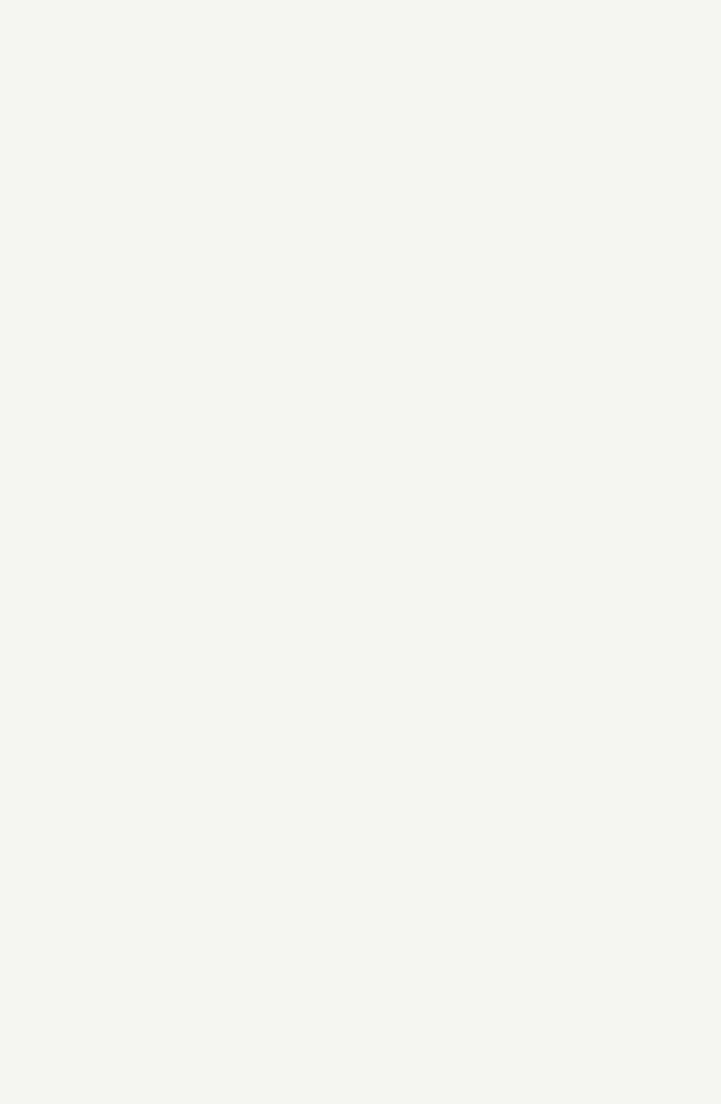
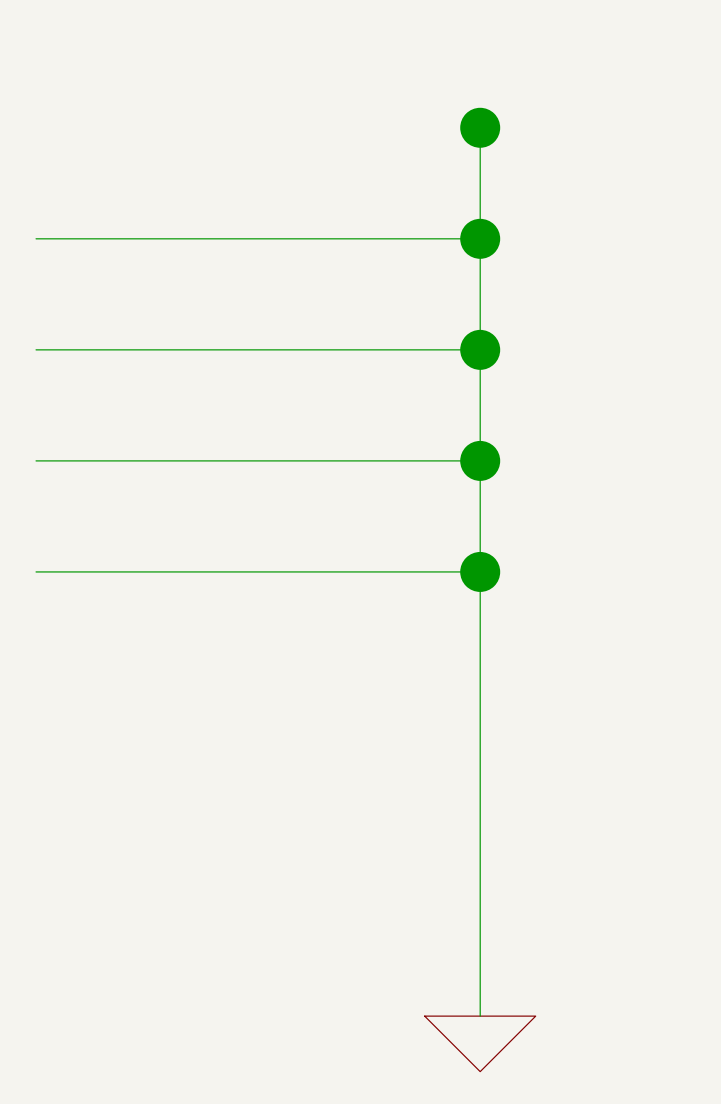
wire: none -> (480, 127) (480, 1016)
junction: none -> (480, 127)
wire: none -> (36, 238) (480, 238)
junction: none -> (480, 238)
wire: none -> (36, 349) (480, 349)
junction: none -> (480, 349)
wire: none -> (36, 460) (480, 460)
junction: none -> (480, 460)
wire: none -> (36, 571) (480, 571)
junction: none -> (480, 571)
power symbol: none -> (480, 1043)

